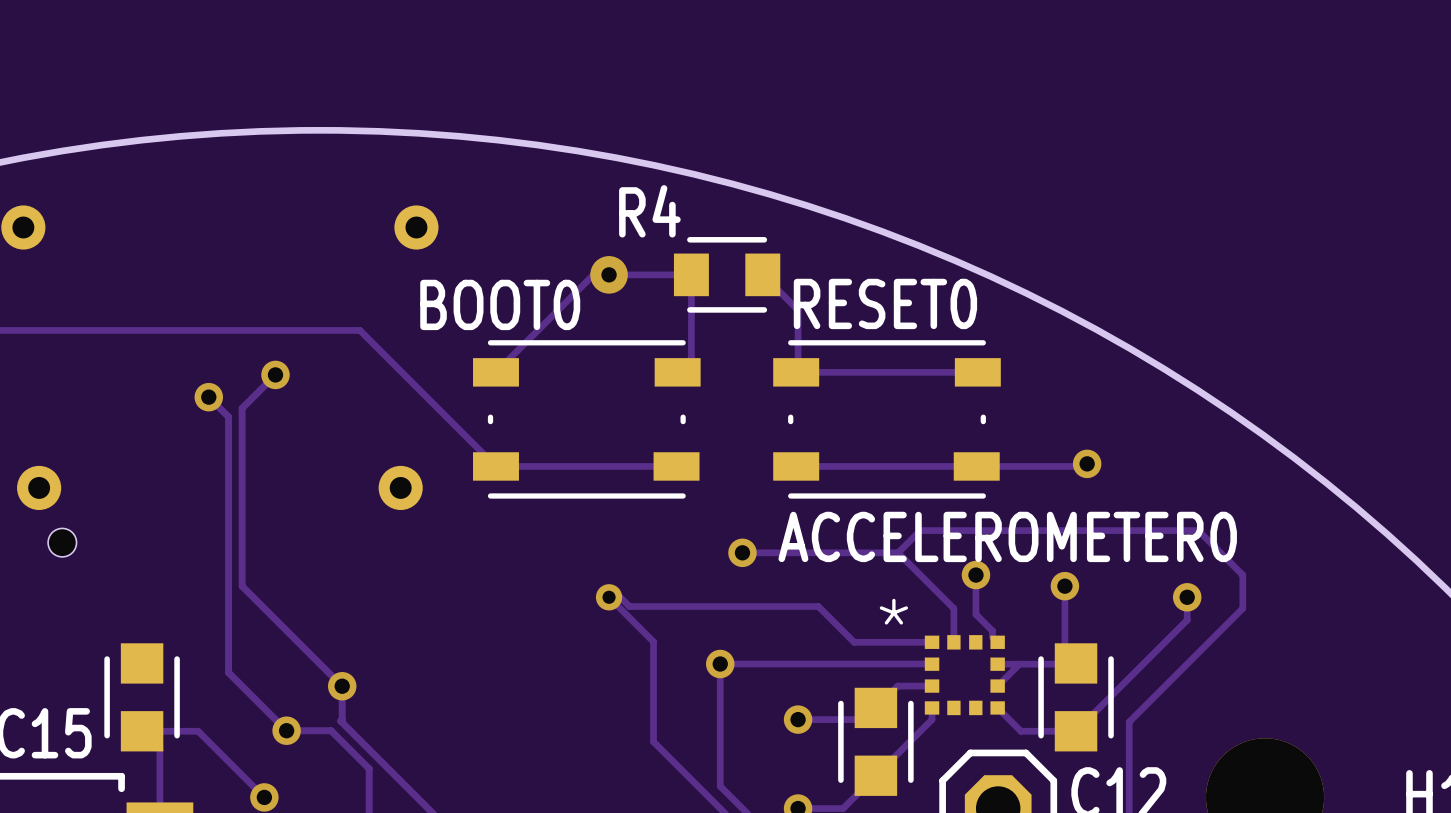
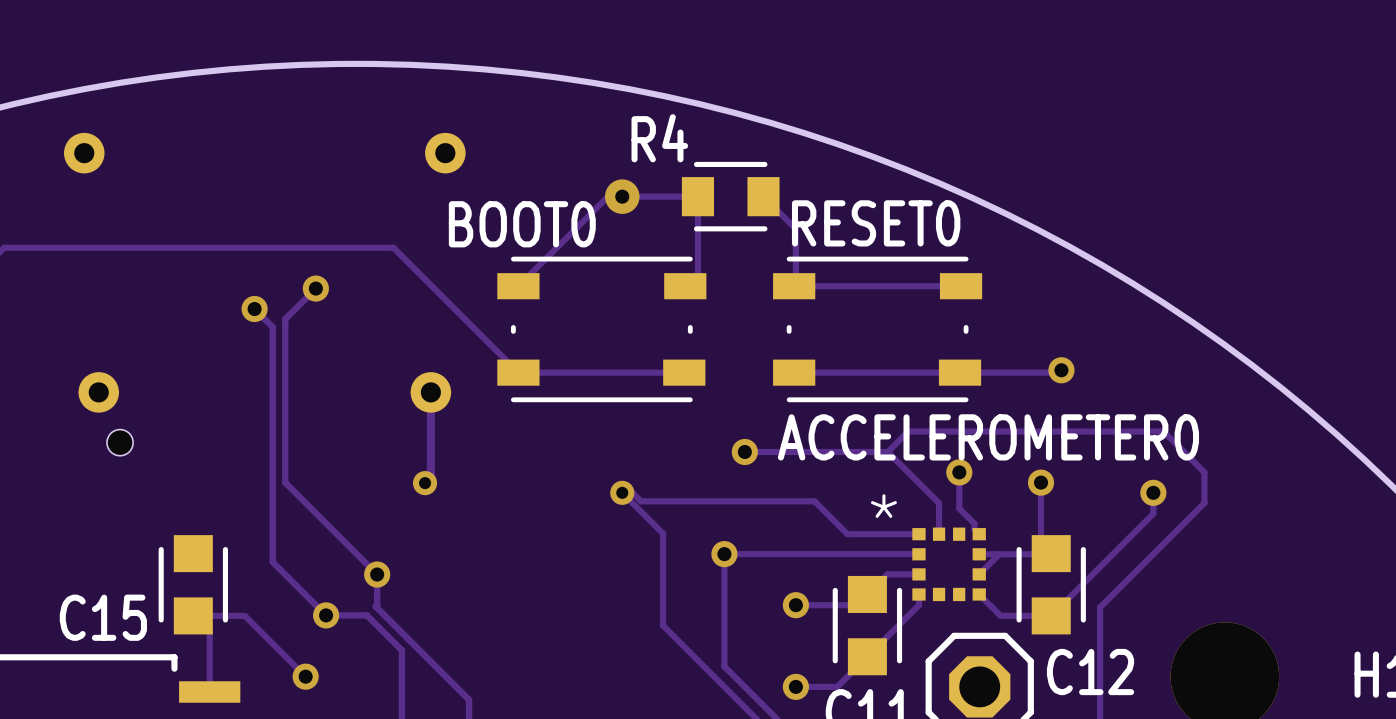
track: none -> (430, 392) (430, 477) (425, 483)
via: none -> (425, 483)

